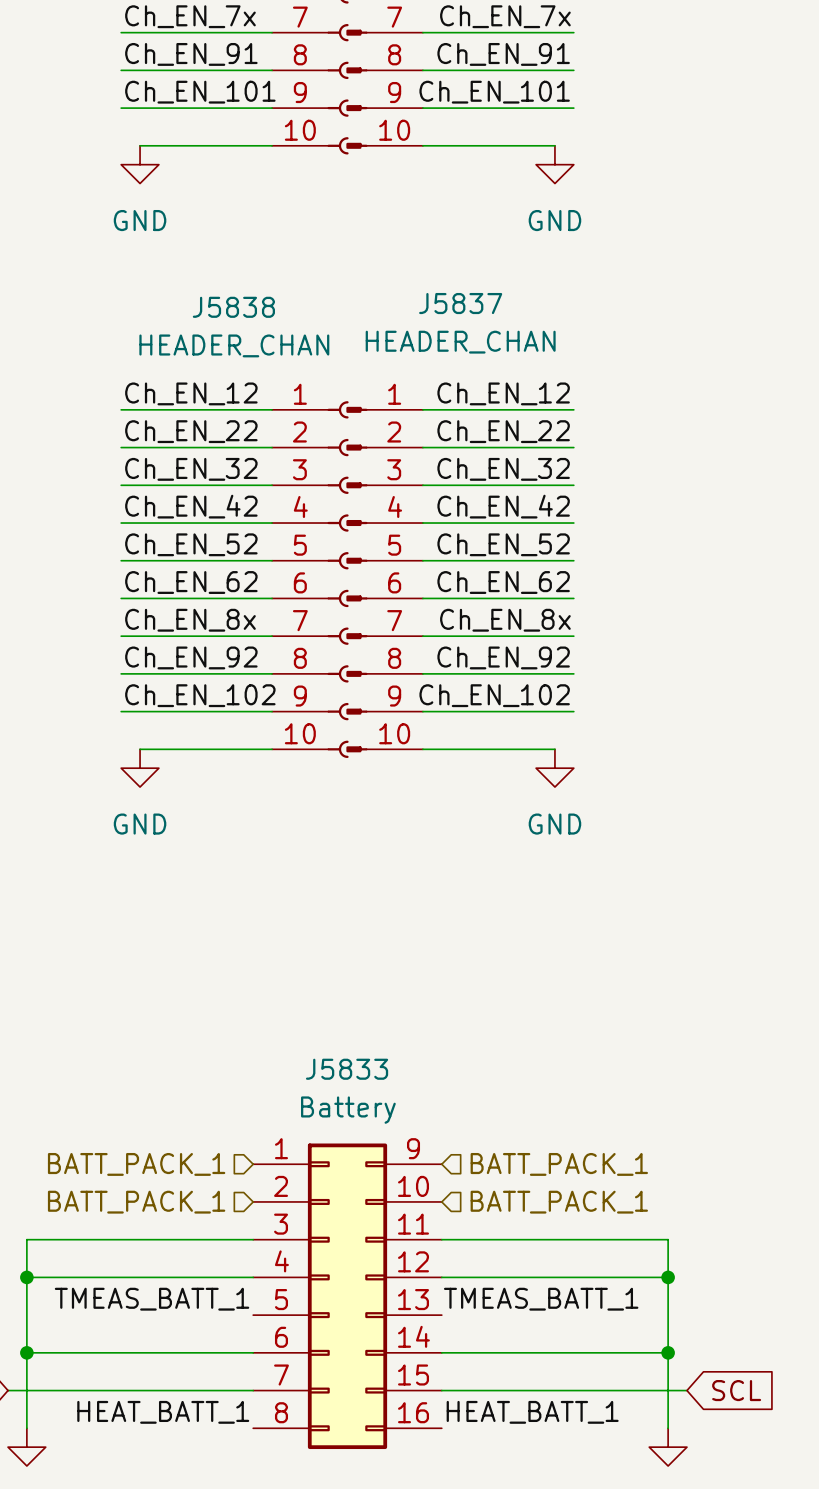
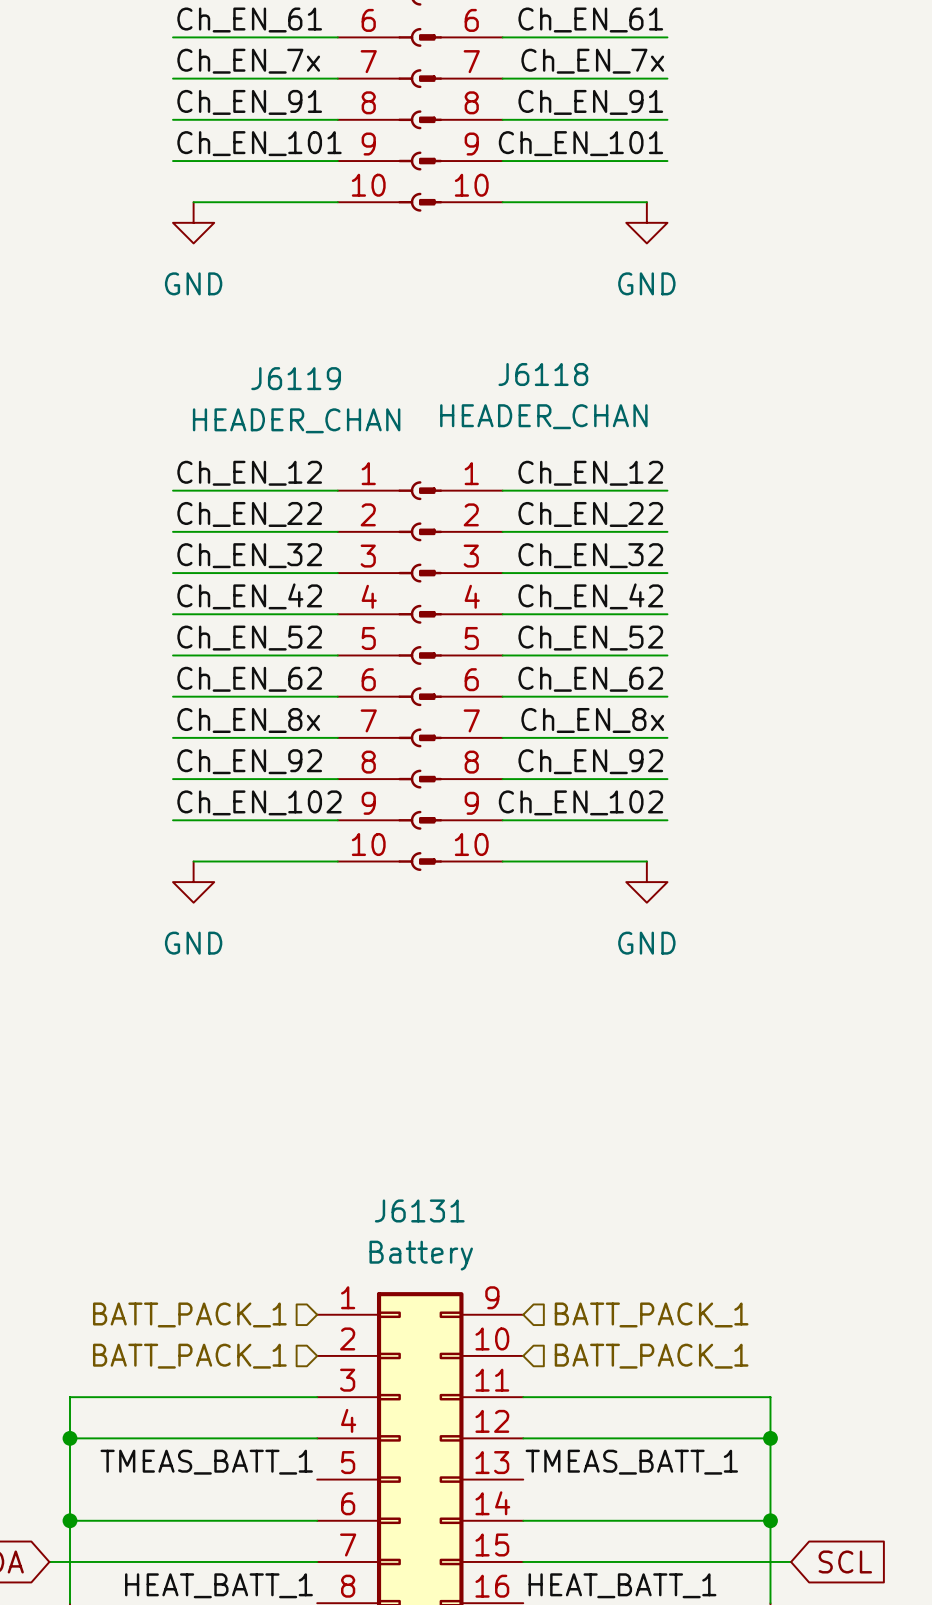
J5837 name: J5837 (460, 303) -> J6118 (543, 374)
J5838 name: J5838 (233, 307) -> J6119 (296, 378)
J5833 name: J5833 (347, 1069) -> J6131 (419, 1210)

